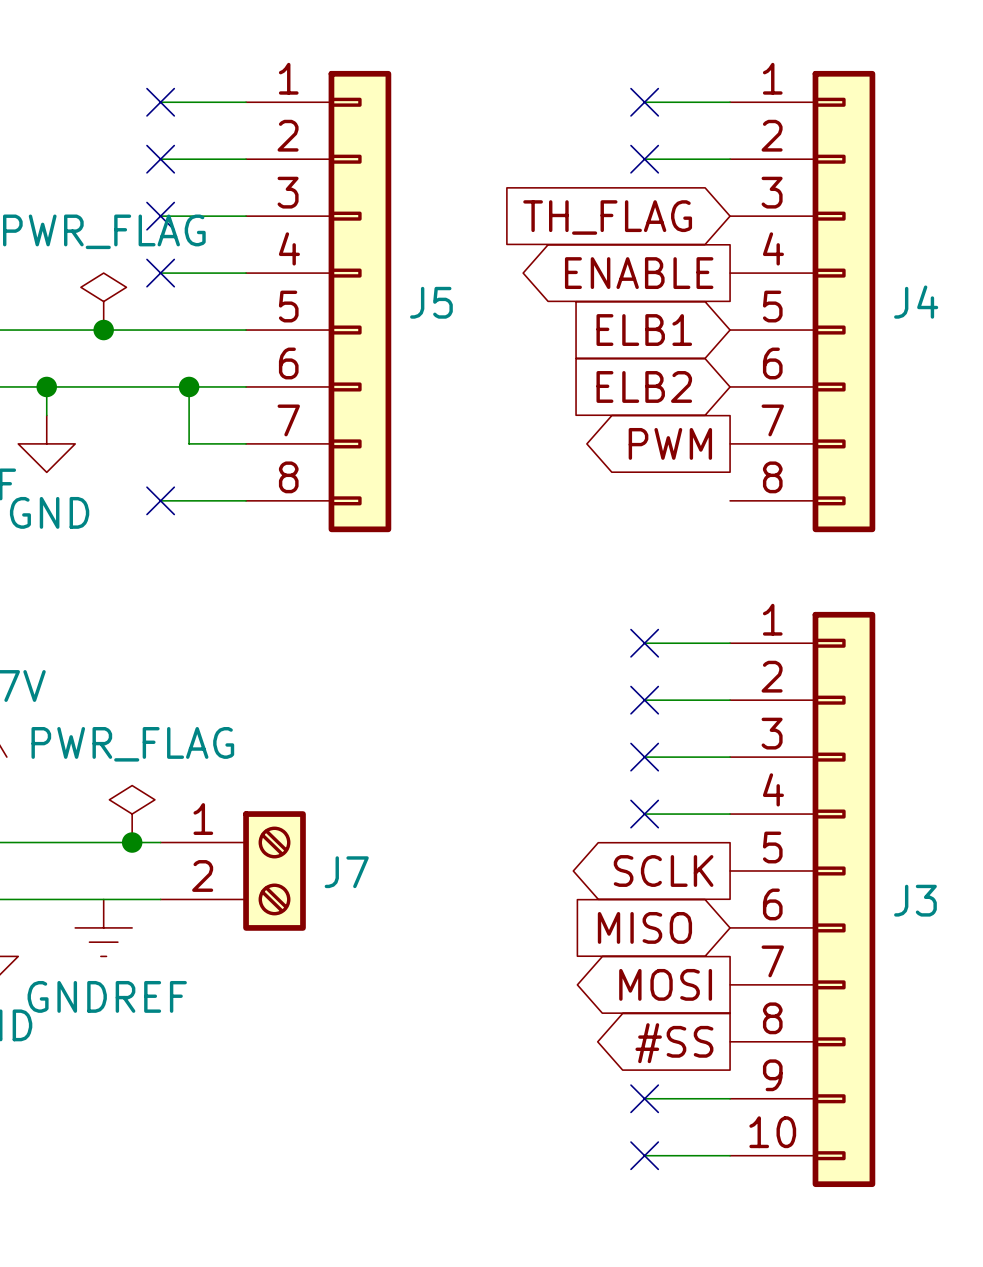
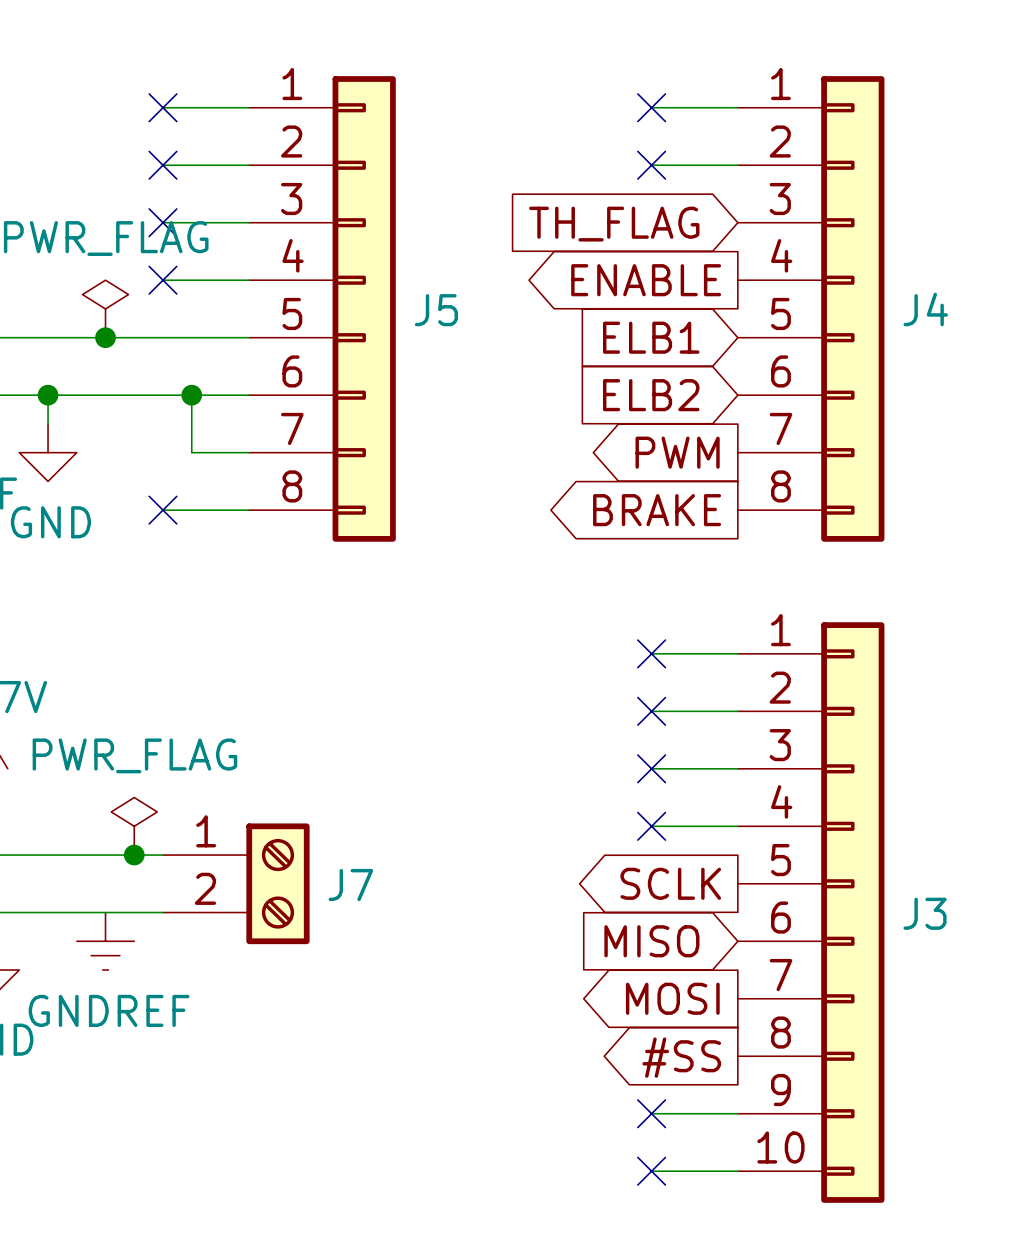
global label: none -> BRAKE (657, 510)

